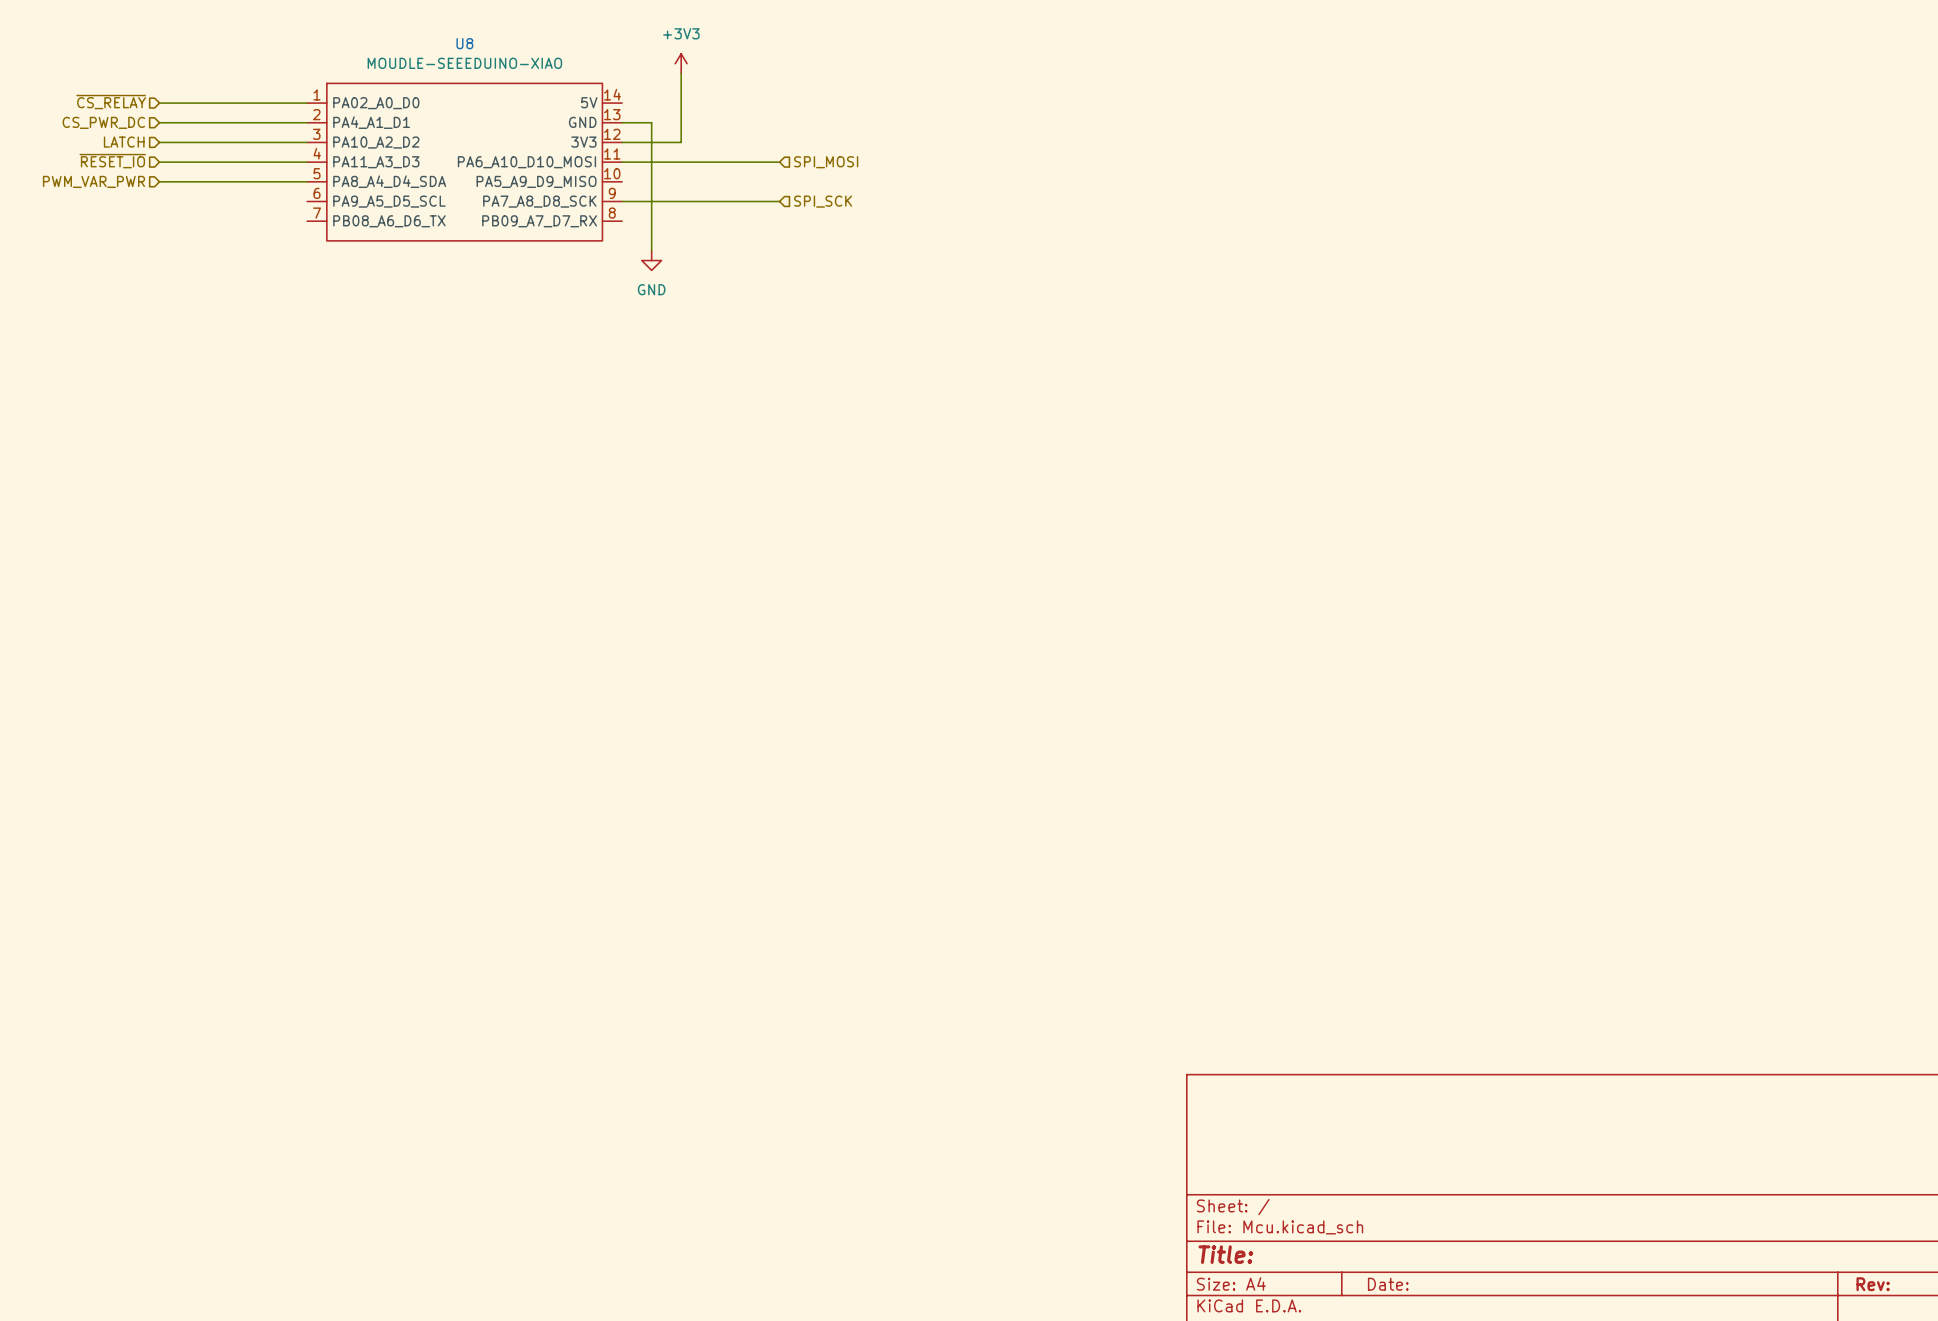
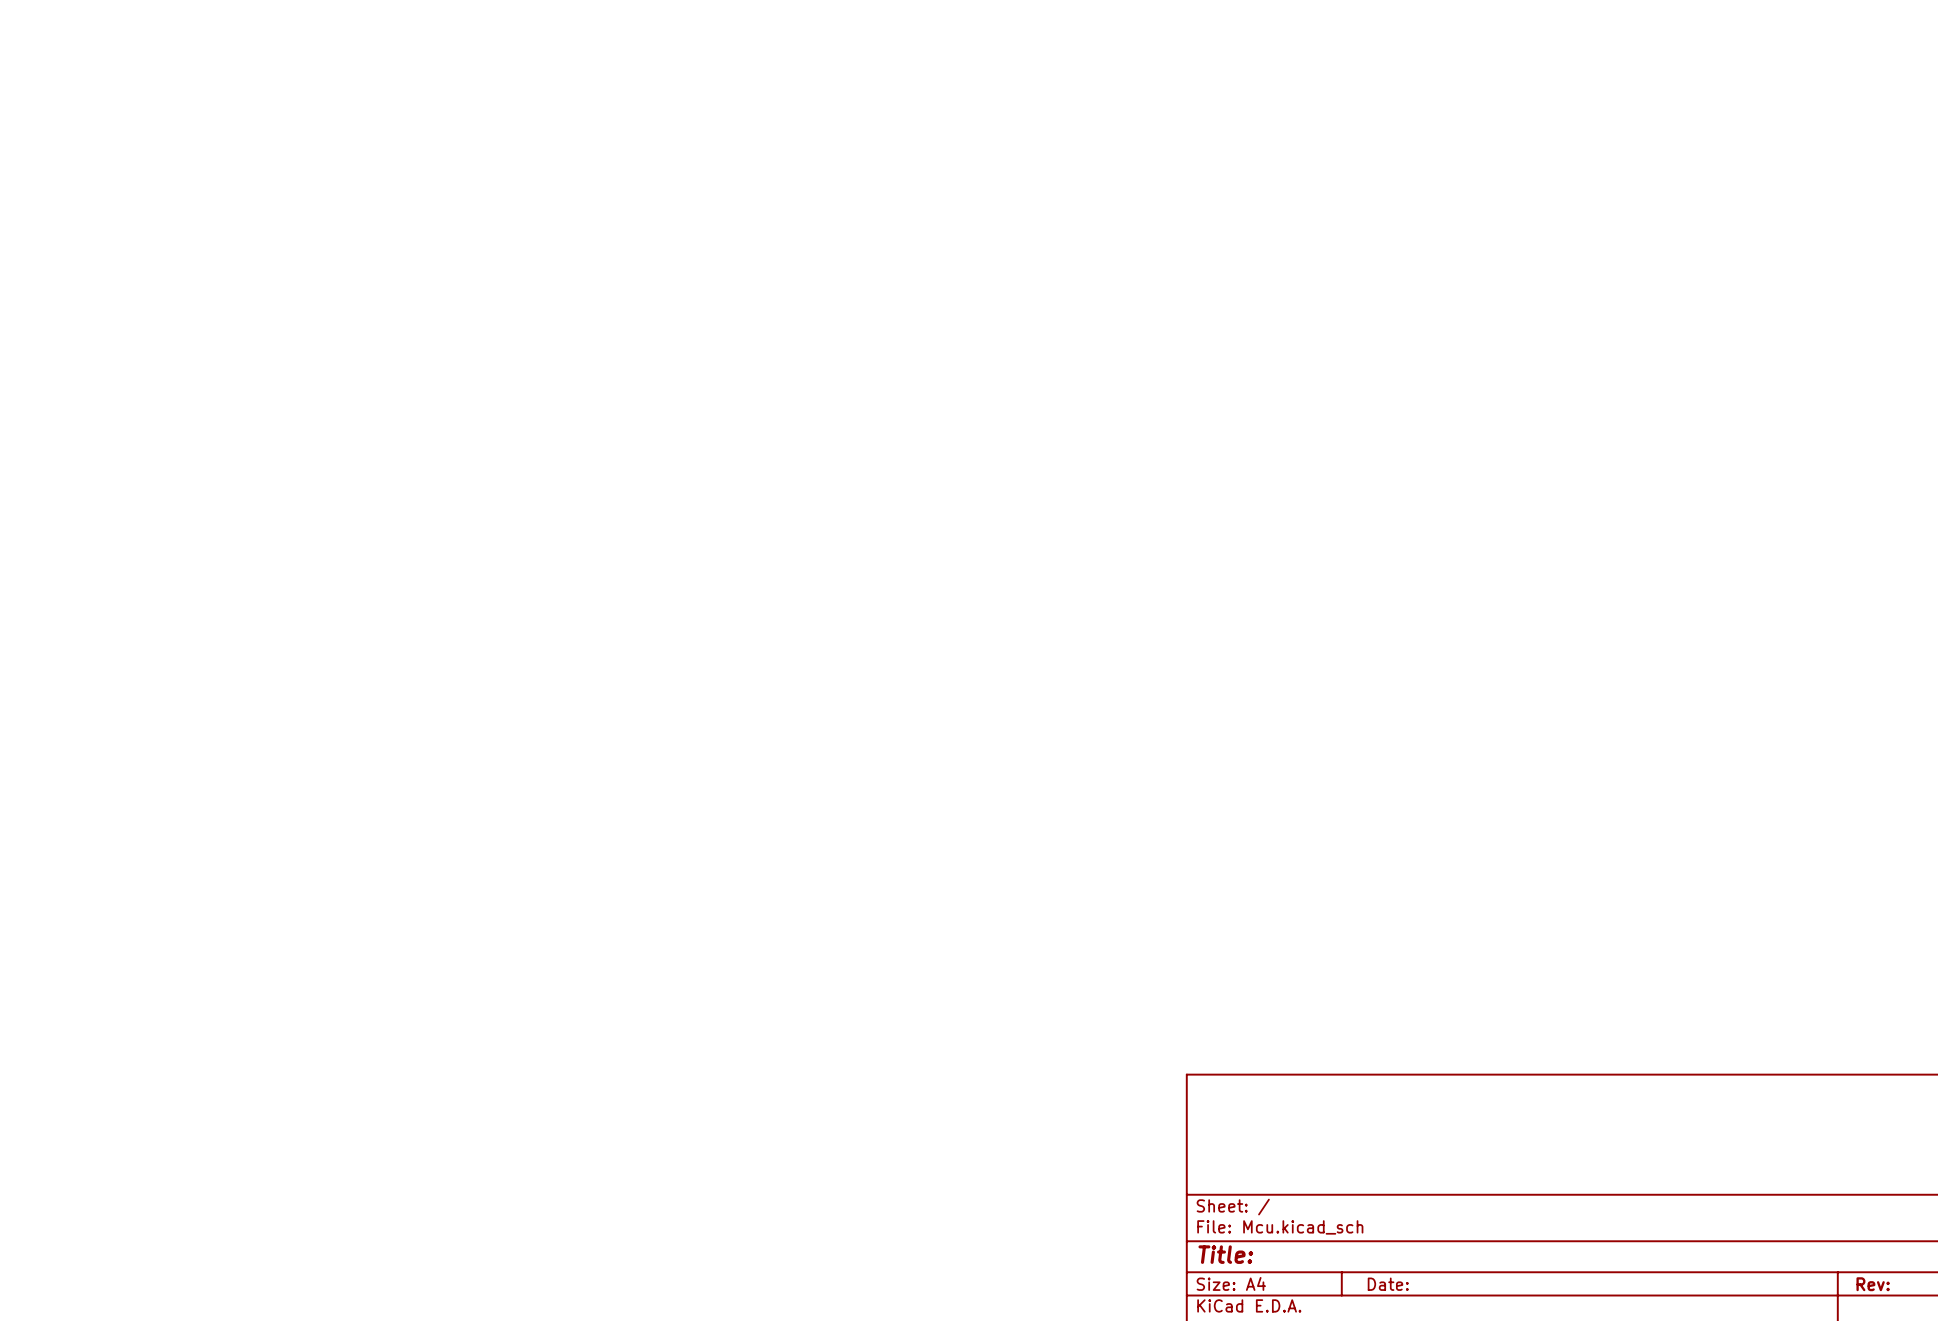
power symbol: +3V3 (681, 63) -> none
wire: (681, 73) (681, 142) (622, 142) -> none
hierarchical label: ~{CS_RELAY} (111, 102) -> none
wire: (159, 103) (307, 103) -> none
hierarchical label: CS_PWR_DC (103, 122) -> none
wire: (159, 122) (307, 122) -> none
wire: (622, 122) (651, 122) (651, 250) -> none
hierarchical label: LATCH (124, 142) -> none
wire: (159, 142) (307, 142) -> none
hierarchical label: ~{RESET_IO} (112, 161) -> none
wire: (159, 162) (307, 162) -> none
U8: MOUDLE-SEEEDUINO-XIAO (464, 162) -> none
wire: (622, 162) (779, 162) -> none
hierarchical label: SPI_MOSI (826, 162) -> none
hierarchical label: PWM_VAR_PWR (93, 181) -> none
wire: (159, 181) (307, 181) -> none
wire: (622, 201) (779, 201) -> none
hierarchical label: SPI_SCK (823, 201) -> none
power symbol: GND (651, 260) -> none

